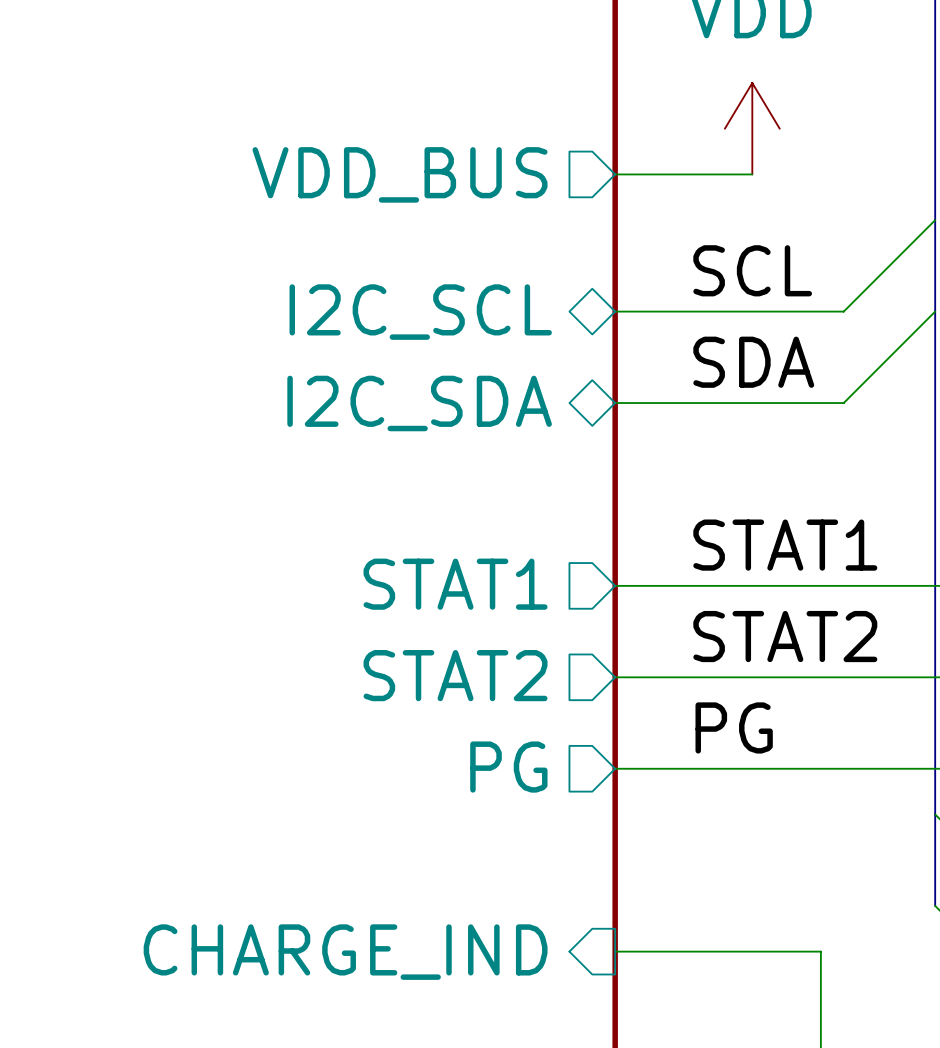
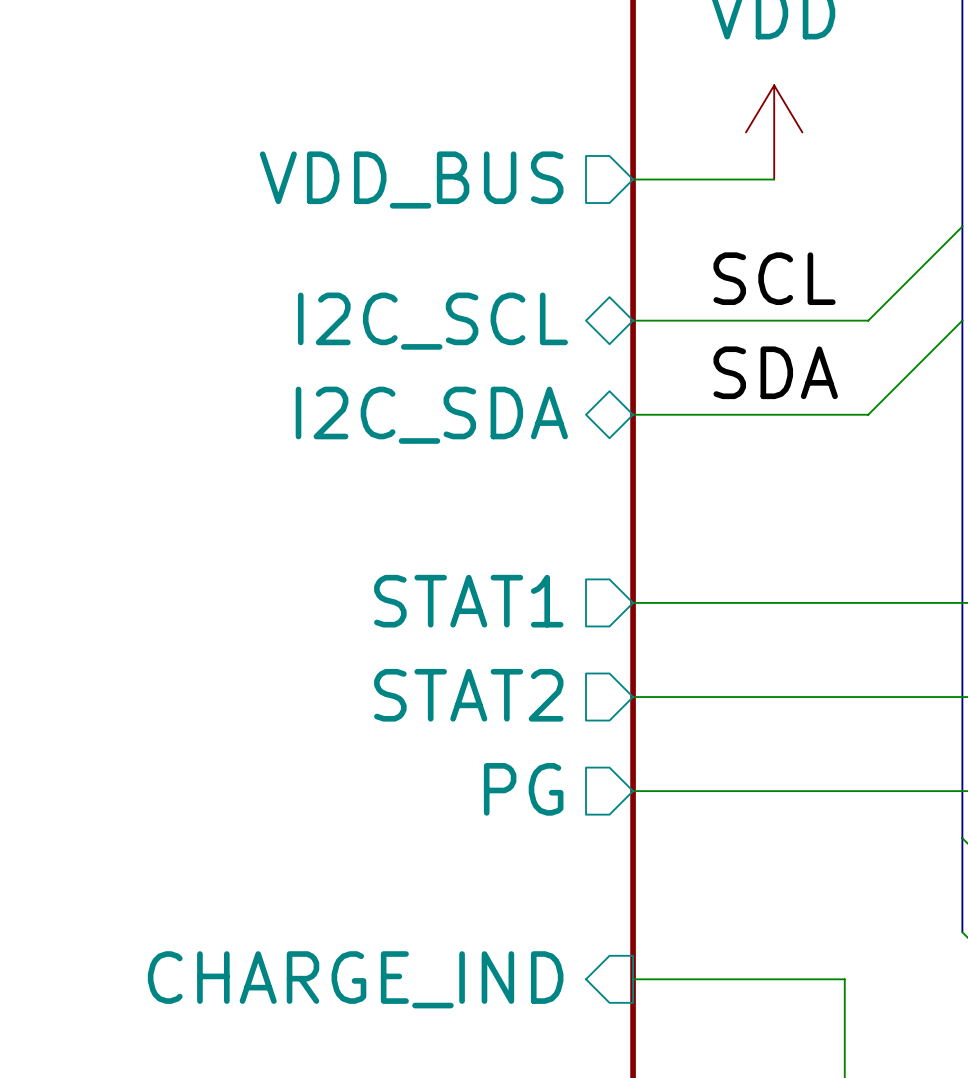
label: STAT1 (785, 545) -> none
label: STAT2 (785, 636) -> none
label: PG (734, 727) -> none

